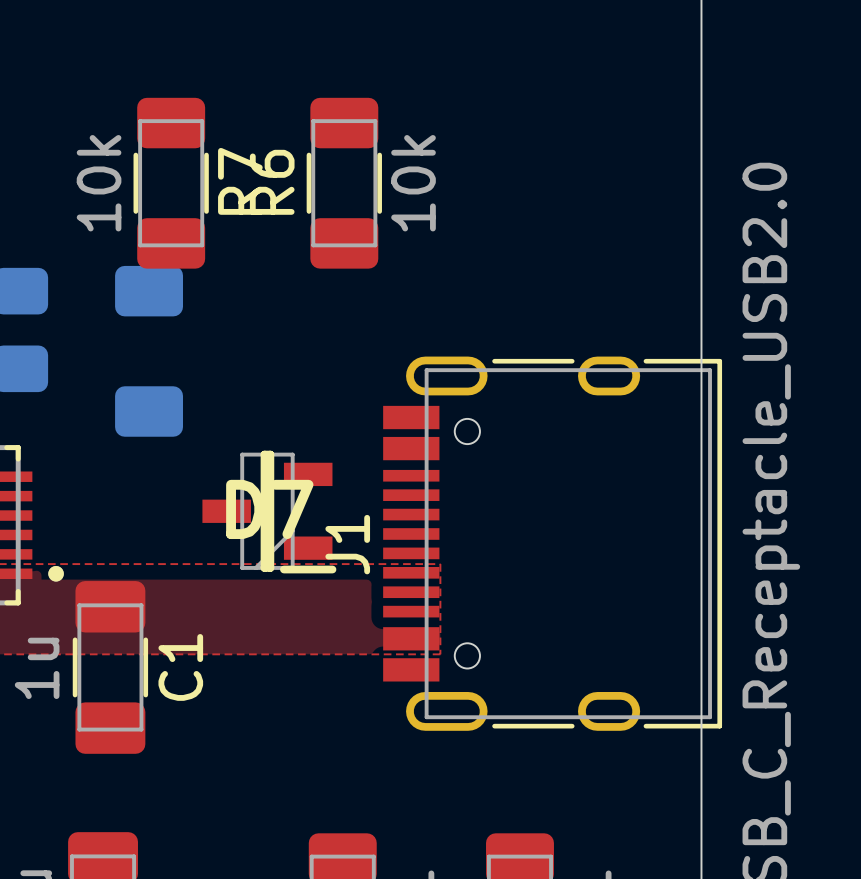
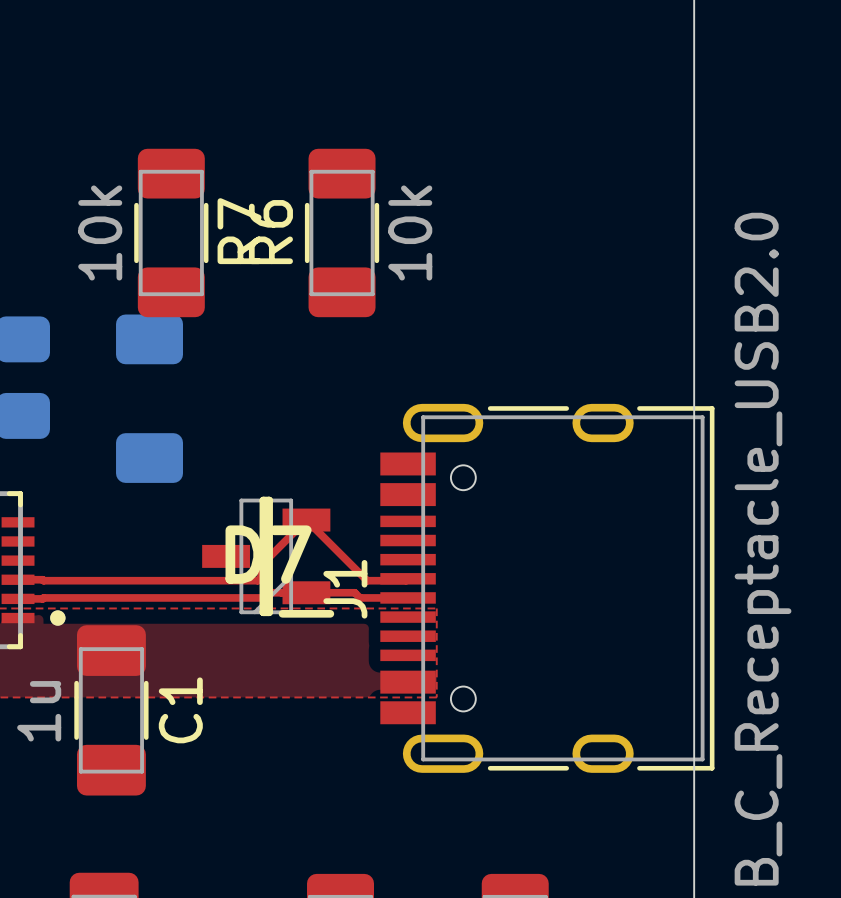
top track: none -> (18, 579) (257, 580) (261, 577) (261, 565) (306, 520) (367, 580) (407, 579)
top track: none -> (18, 597) (264, 597) (270, 592) (354, 592) (359, 597) (408, 597)

